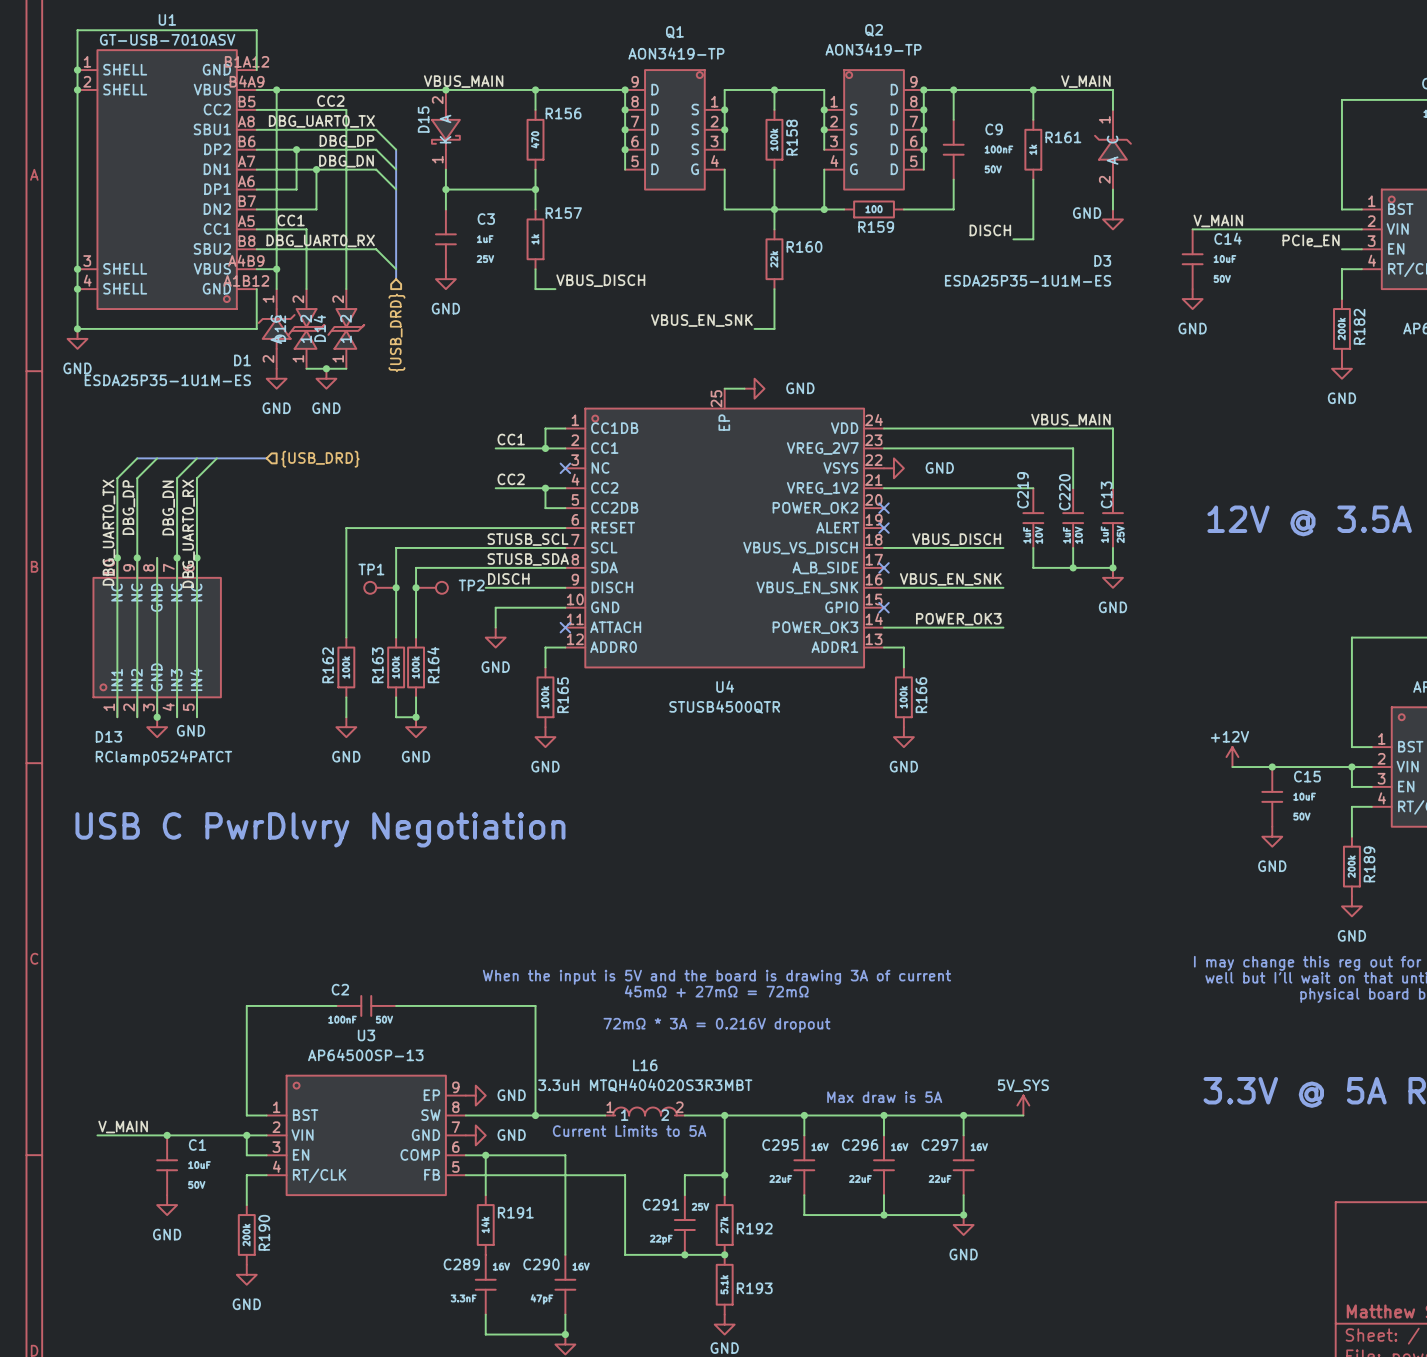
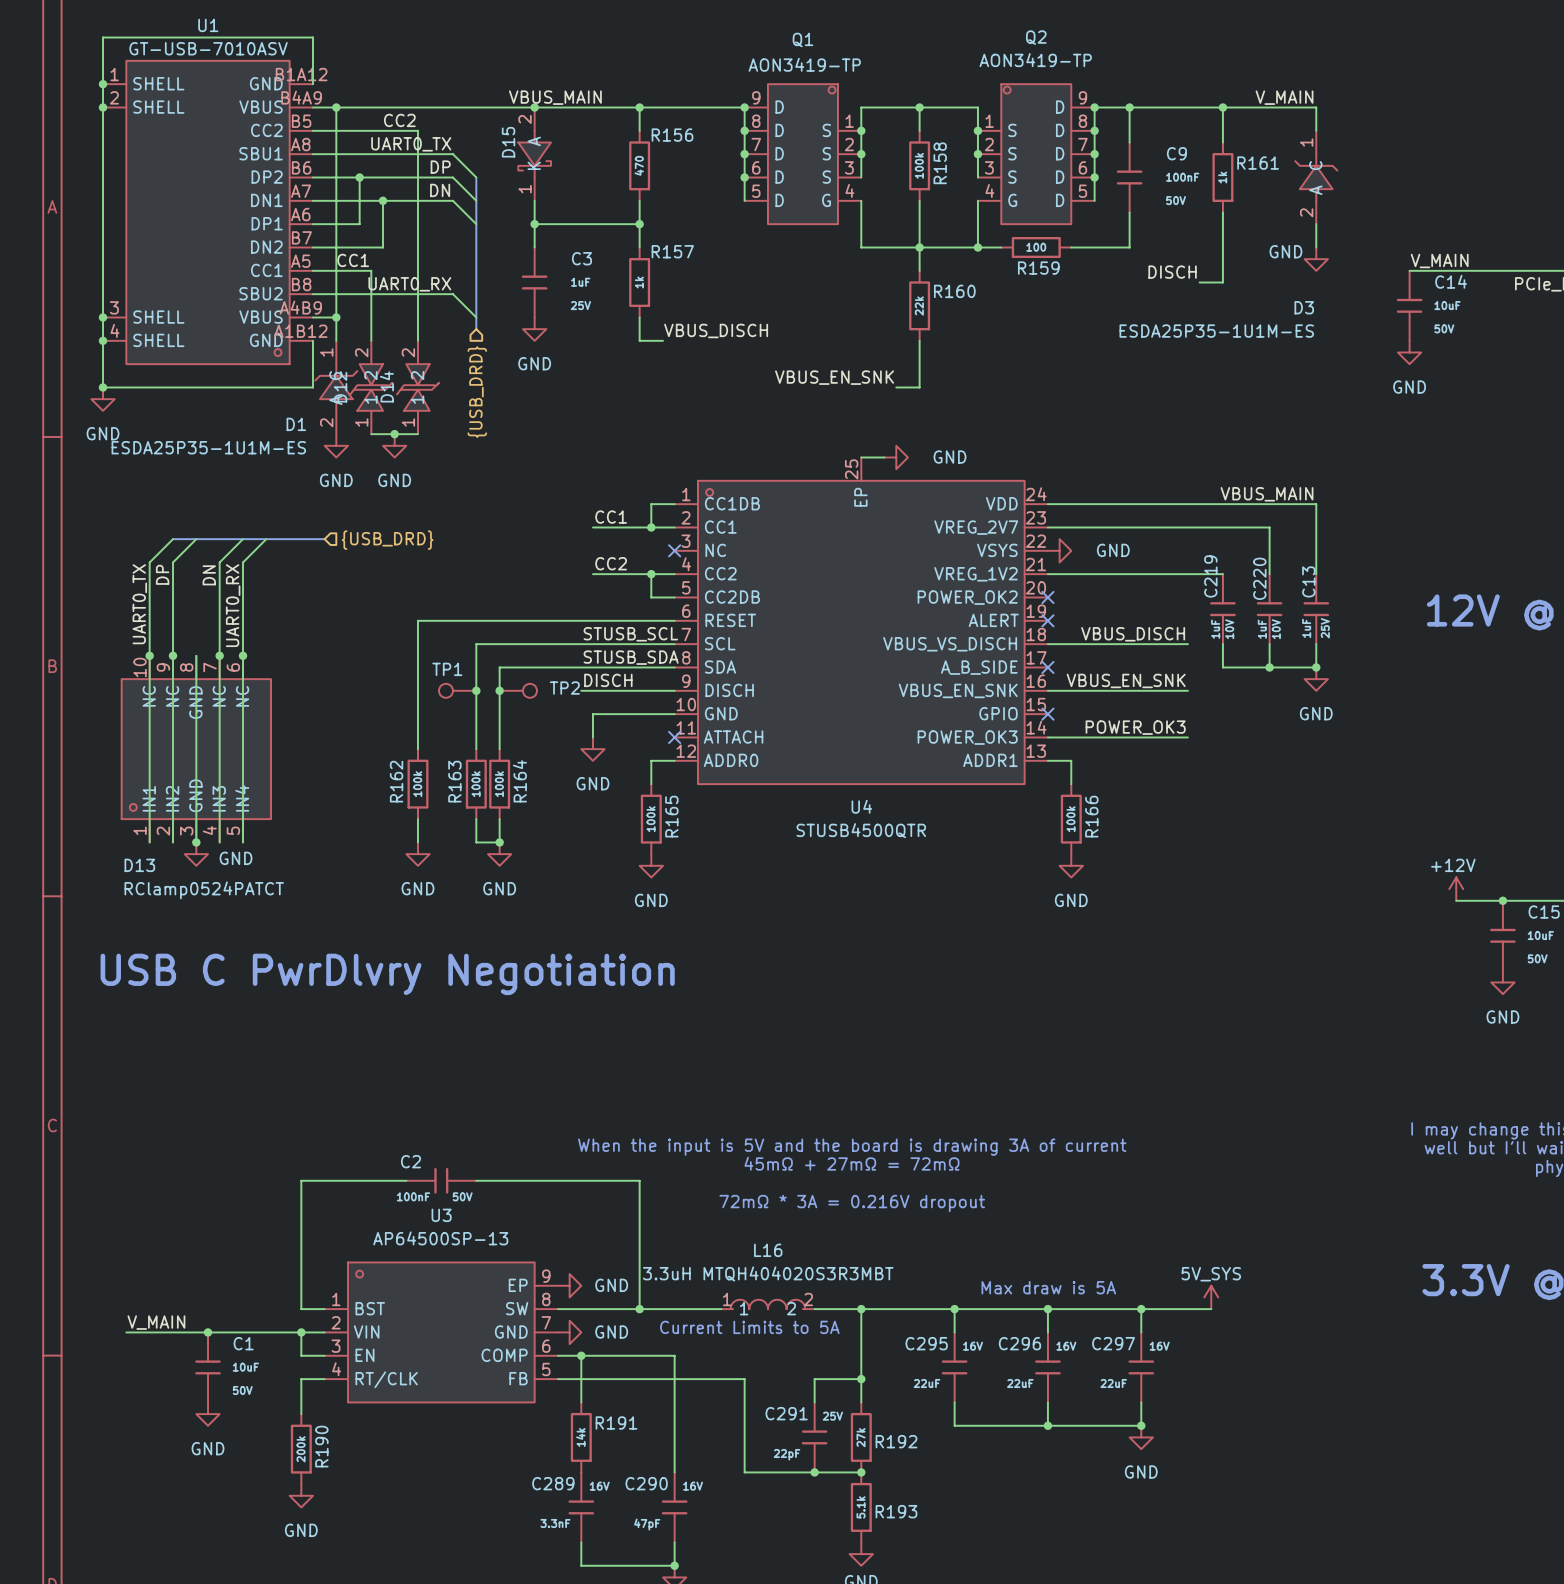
label: DBG_UART0_TX (321, 121) -> UART0_TX (411, 144)
label: DBG_DP (346, 141) -> DP (440, 167)
label: DBG_DN (346, 161) -> DN (440, 190)
label: DBG_UART0_RX (320, 240) -> UART0_RX (409, 284)
label: DBG_DP (128, 507) -> DP (162, 574)
label: DBG_DN (168, 507) -> DN (209, 575)
label: DBG_UART0_TX (108, 532) -> UART0_TX (139, 604)
label: DBG_UART0_RX (188, 533) -> UART0_RX (233, 605)

